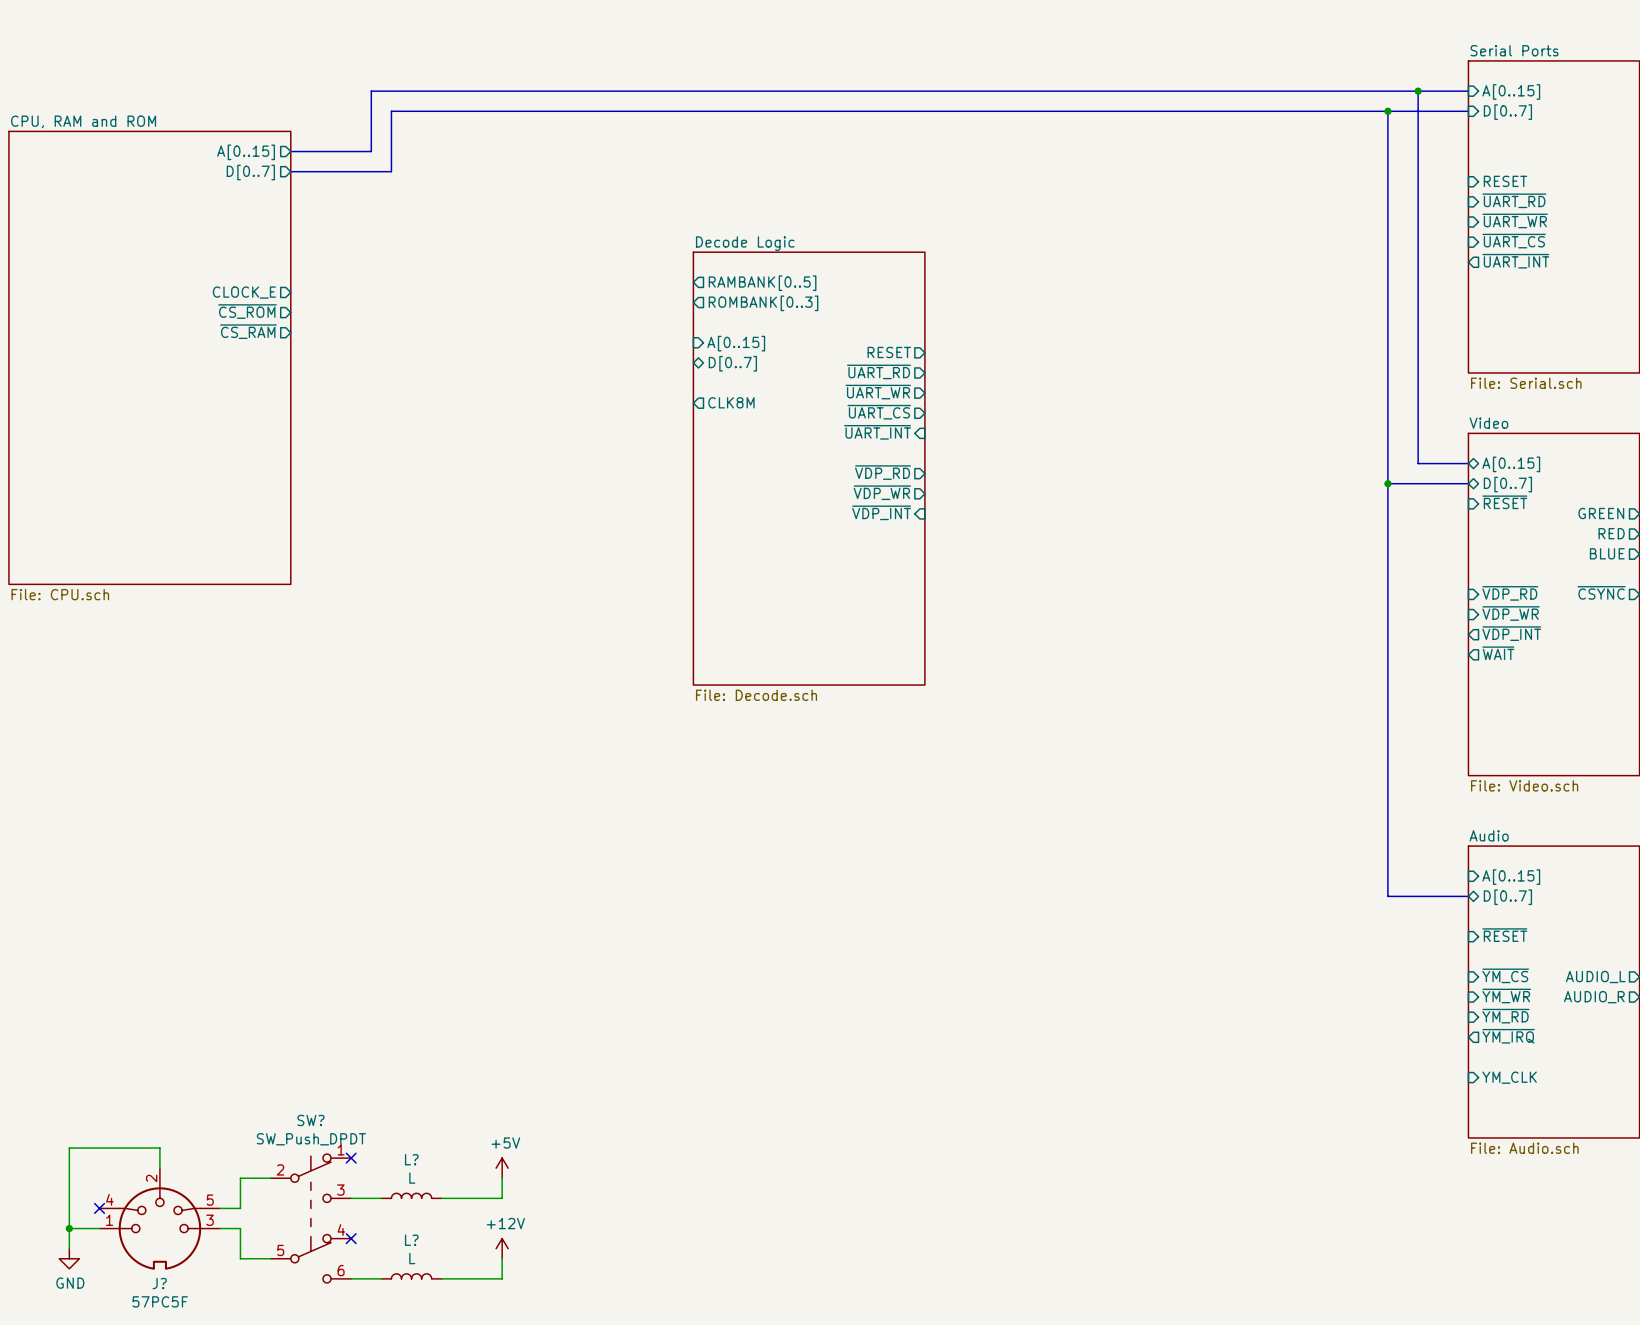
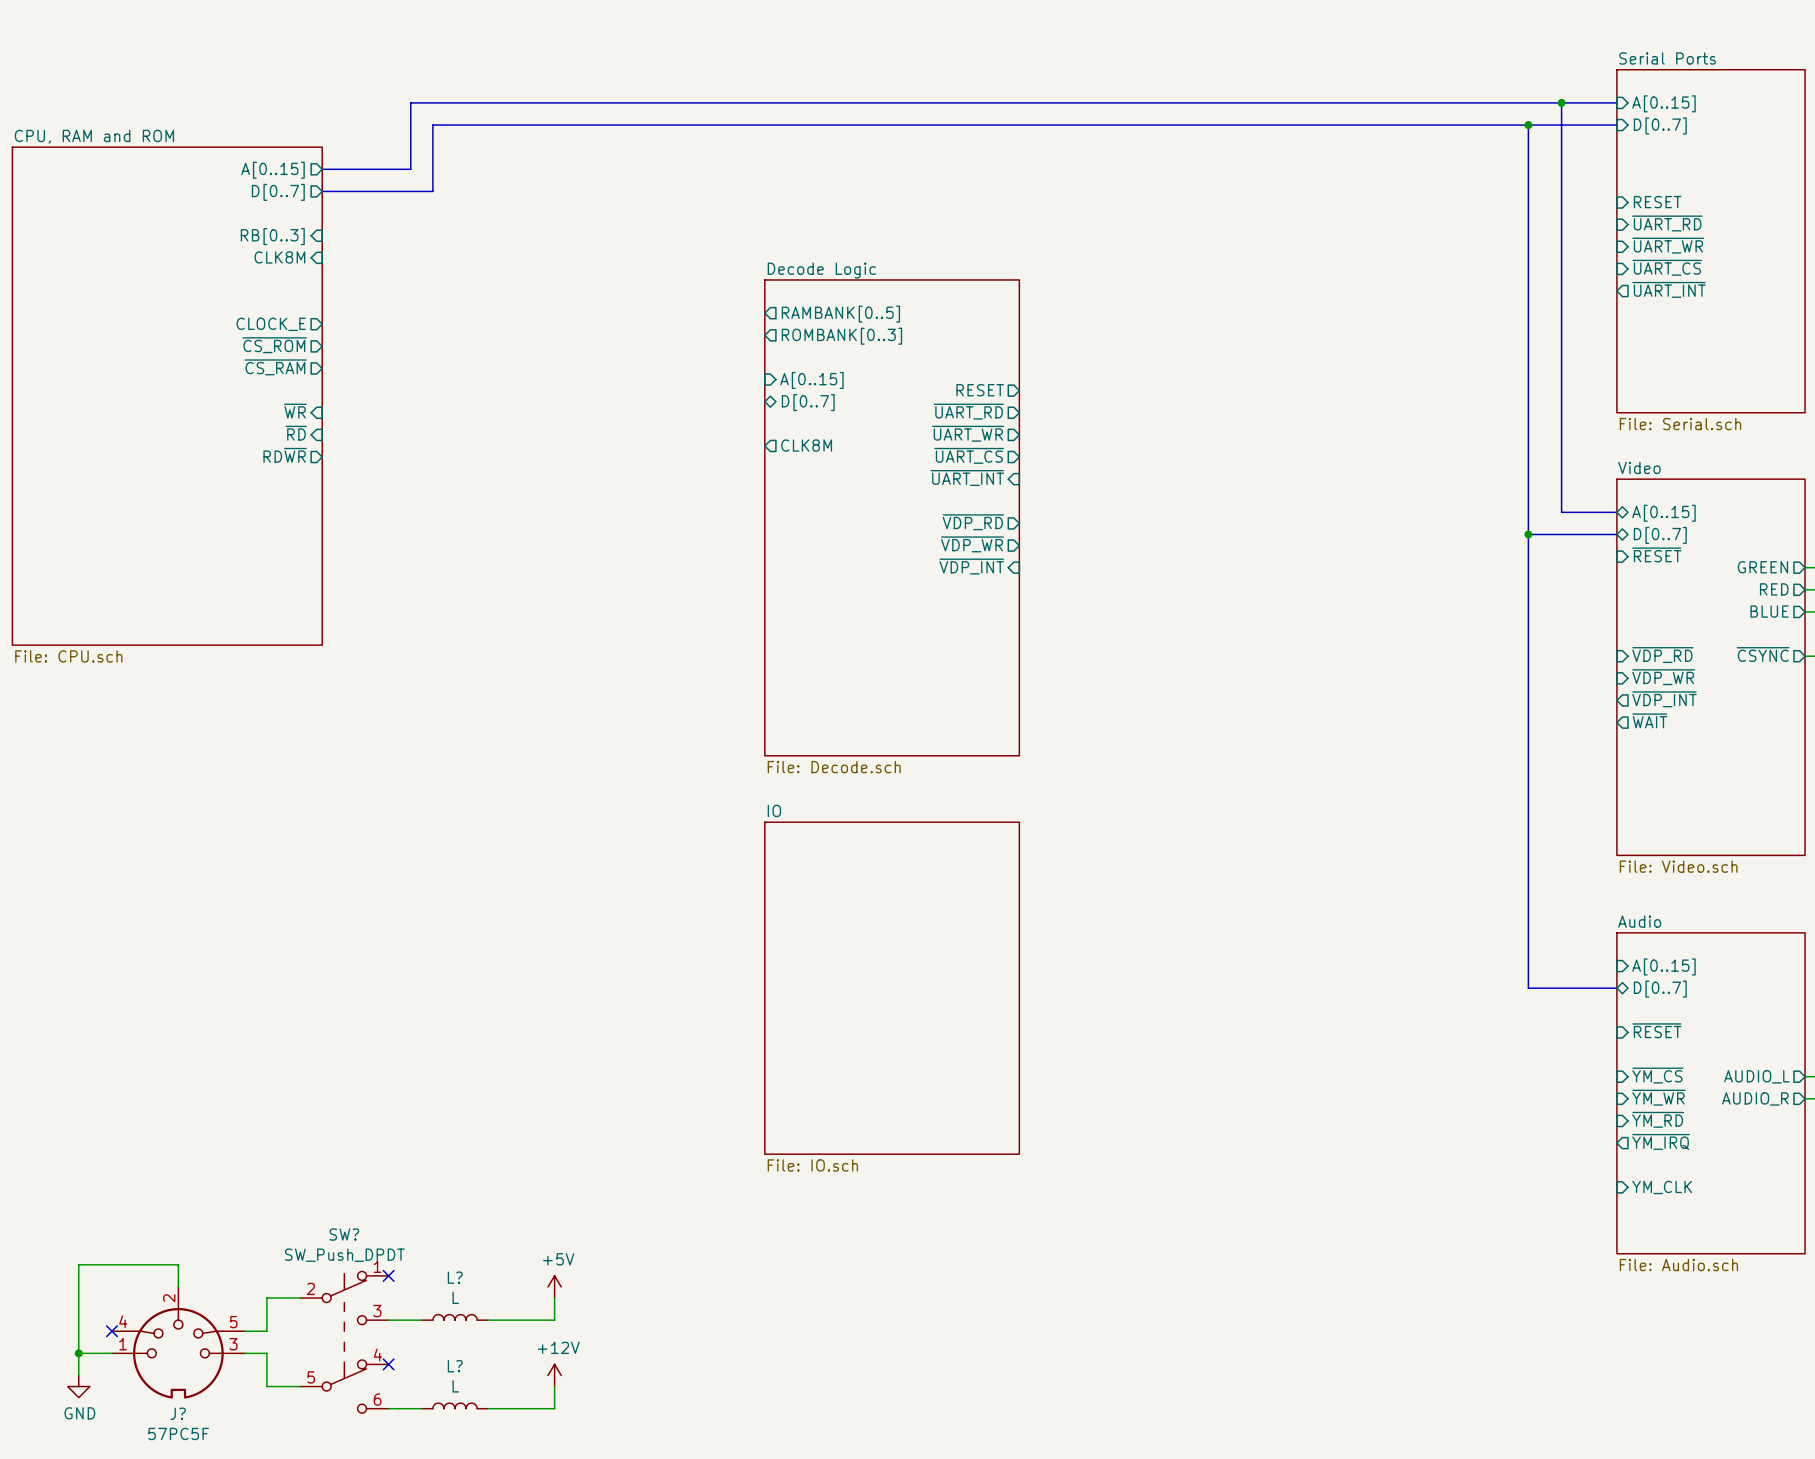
sheet pin: none -> RB[0..3] (272, 236)
sheet pin: none -> CLK8M (279, 257)
sheet pin: none -> ~{WR} (295, 411)
sheet pin: none -> ~{RD} (296, 433)
sheet pin: none -> RD~{WR} (285, 455)
sheet IO: none -> File: IO.sch (892, 988)

